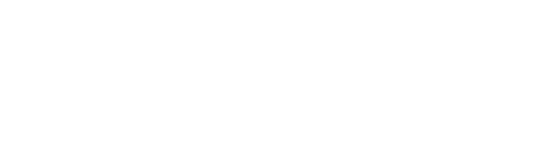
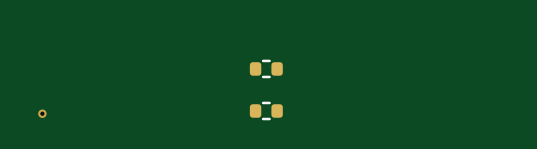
part: none -> (266, 68)
part: none -> (266, 110)
via: none -> (42, 113)

